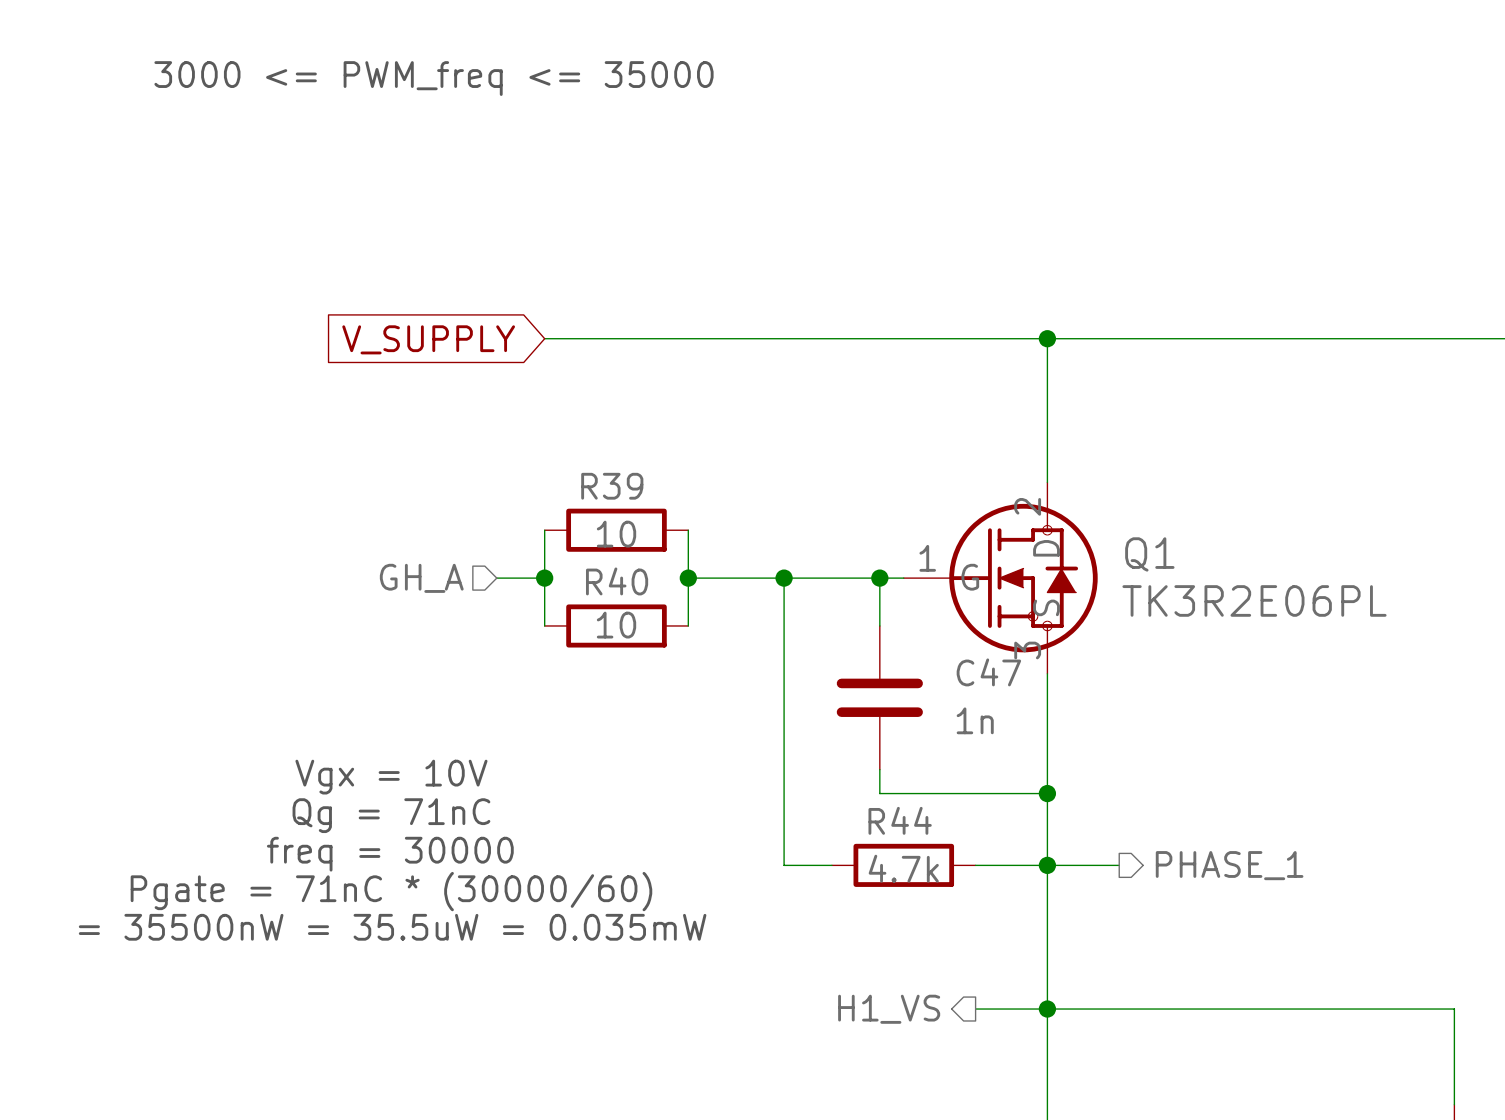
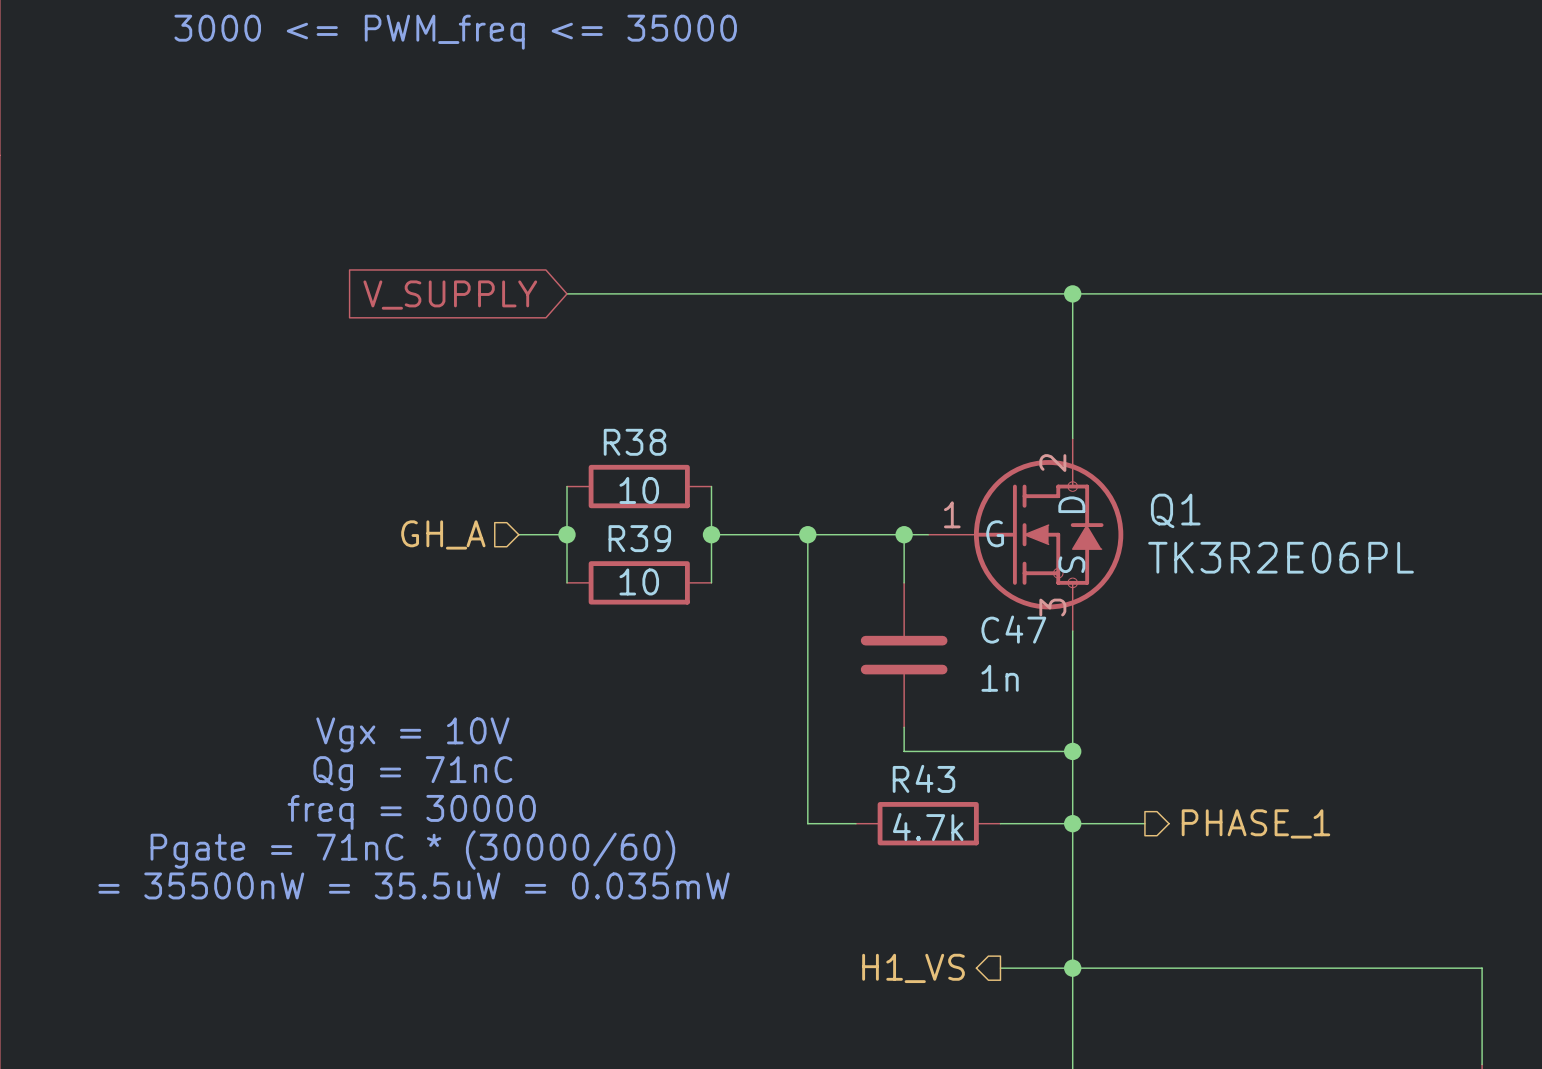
R39 name: R39 (612, 486) -> R38 (635, 442)
R40 name: R40 (617, 581) -> R39 (639, 538)
R44 name: R44 (900, 820) -> R43 (923, 778)

